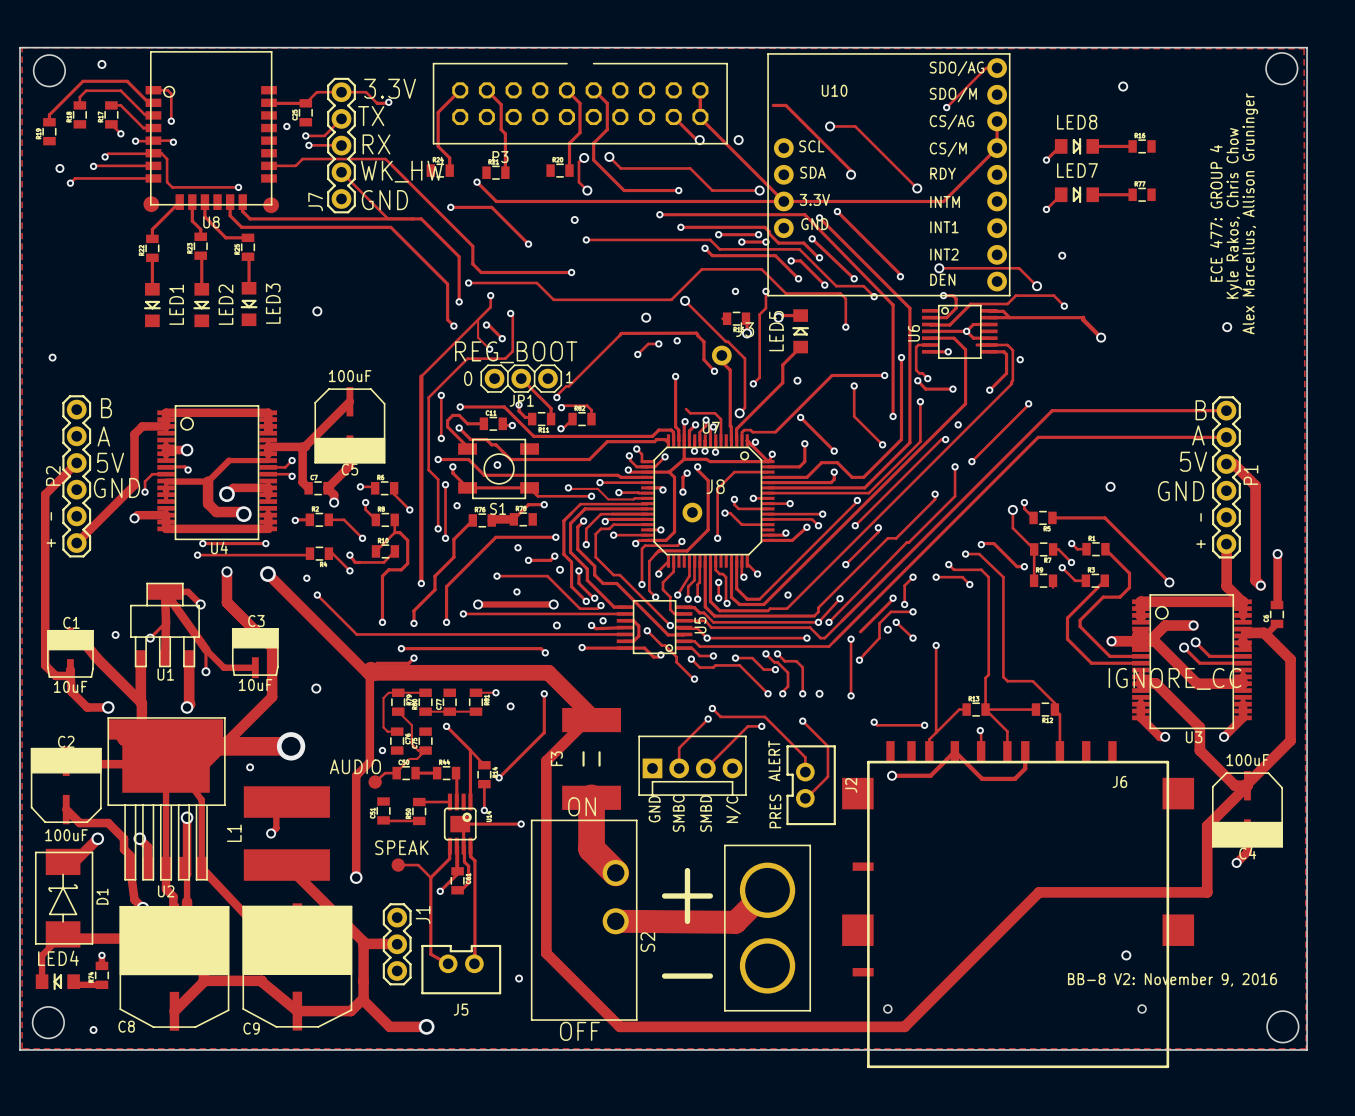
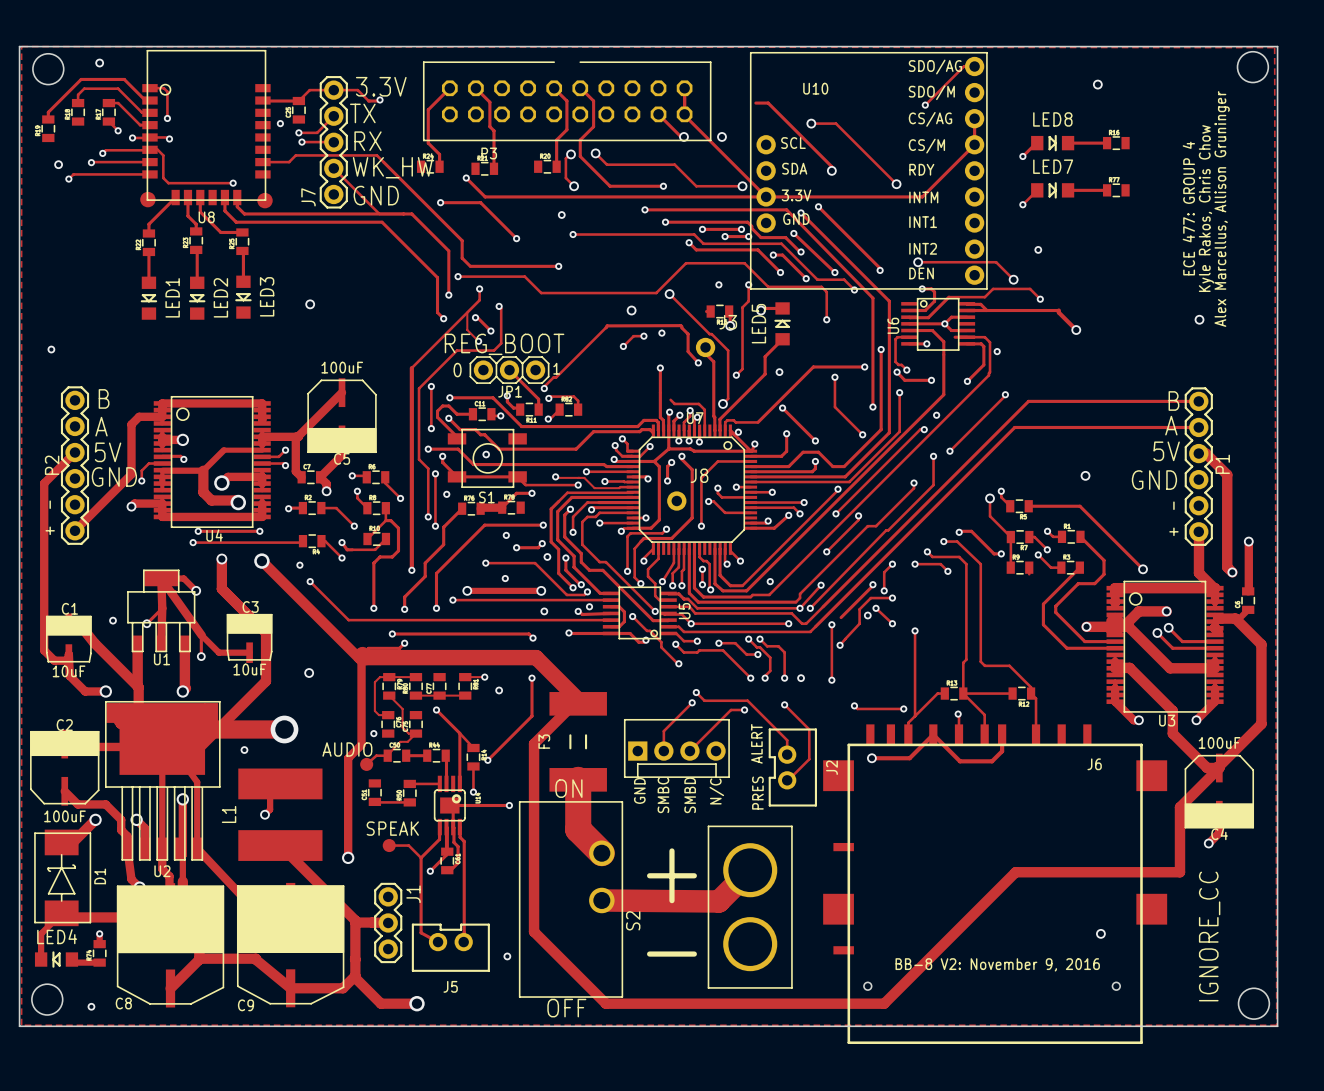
text rotation: 0° (1175, 678) -> 90° counterclockwise (1209, 936)
text position: IGNORE_CC (1175, 678) -> IGNORE_CC (1209, 936)
text position: BB-8 V2: November 9, 2016 (1172, 979) -> BB-8 V2: November 9, 2016 (997, 964)

